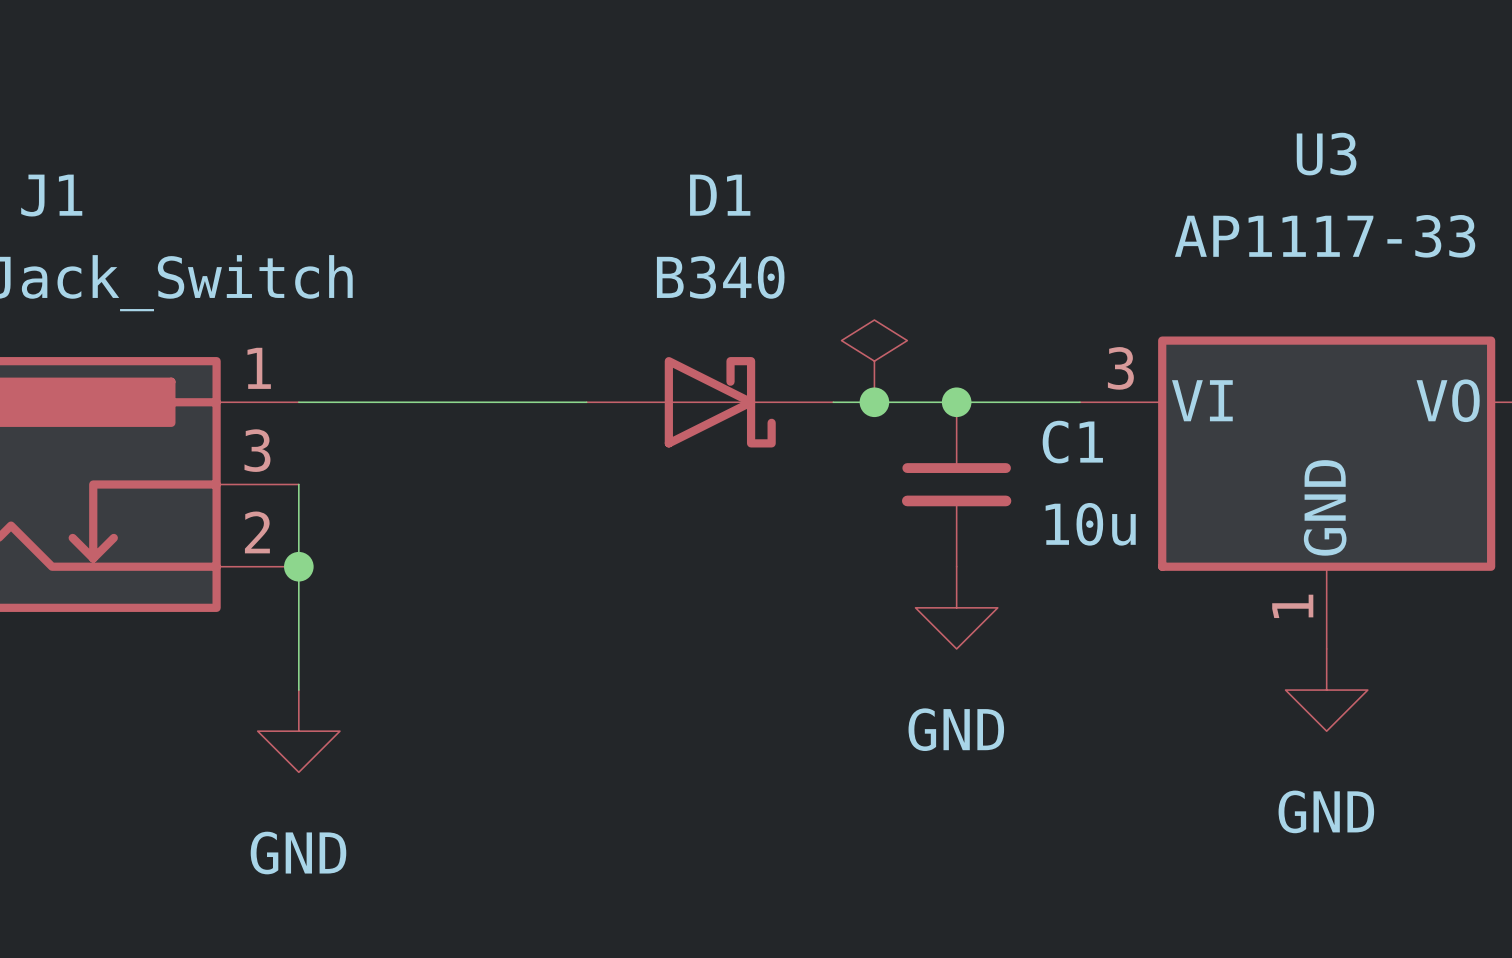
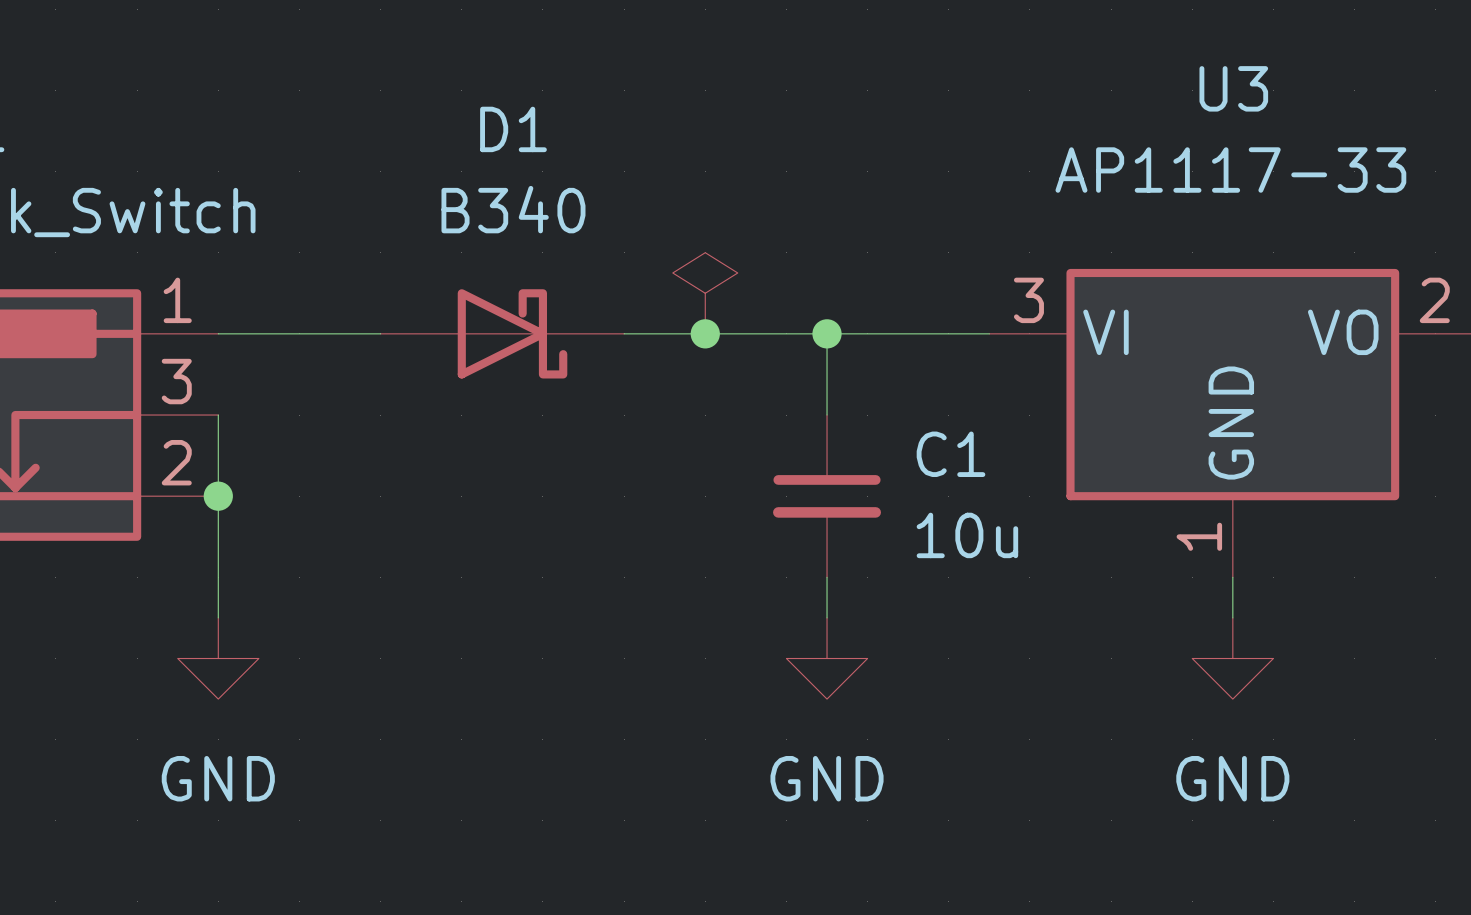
power symbol position: (874, 361) -> (705, 293)
D1 position: (709, 402) -> (502, 333)
junction: none -> (705, 333)
junction: (874, 402) -> none
wire: none -> (827, 333) (827, 415)
junction: none -> (827, 333)
junction: (956, 402) -> none
C1 position: (956, 484) -> (827, 496)
power symbol position: GND (956, 607) -> GND (827, 658)
wire: none -> (827, 577) (827, 617)
power symbol position: GND (1326, 690) -> GND (1232, 658)

